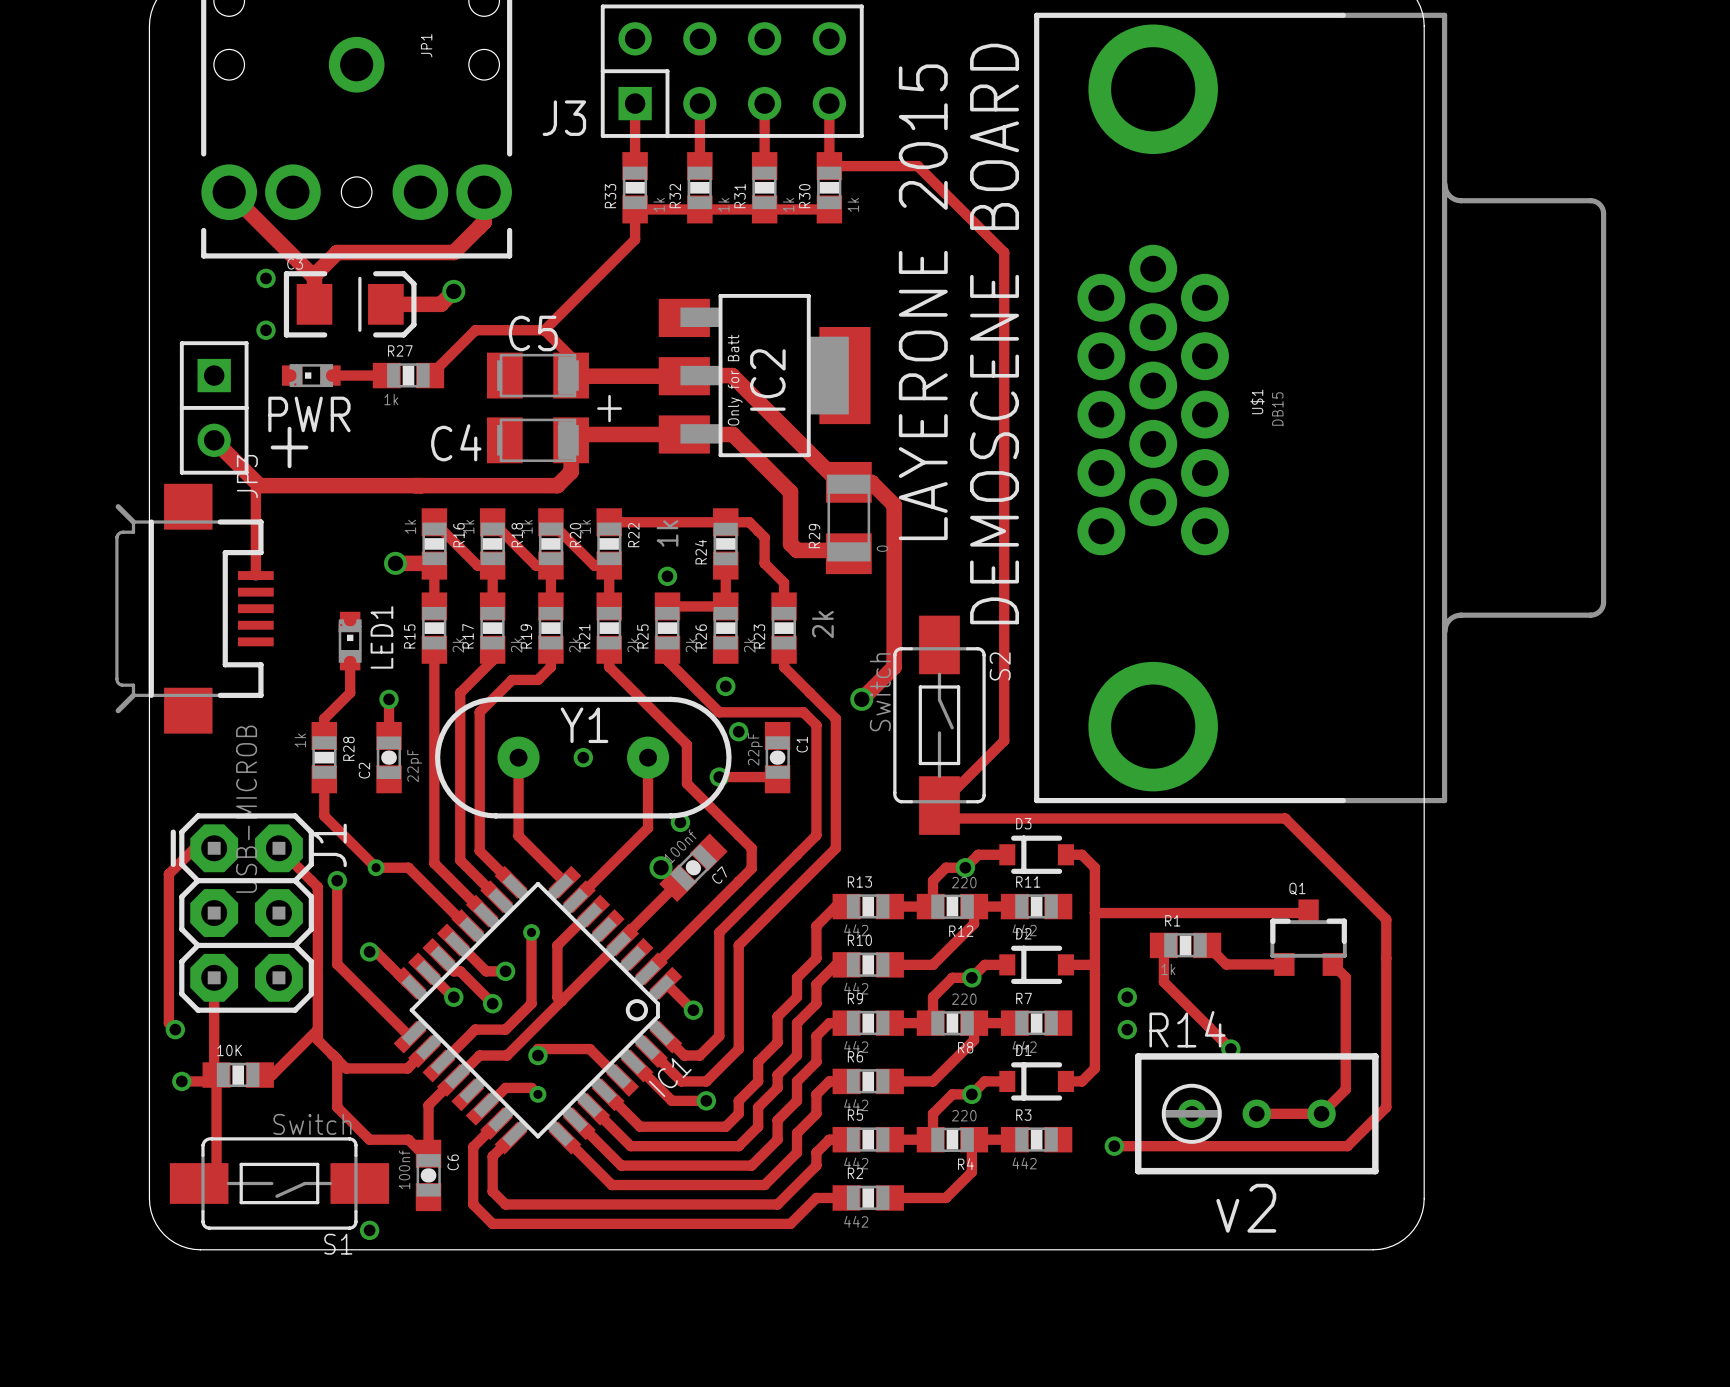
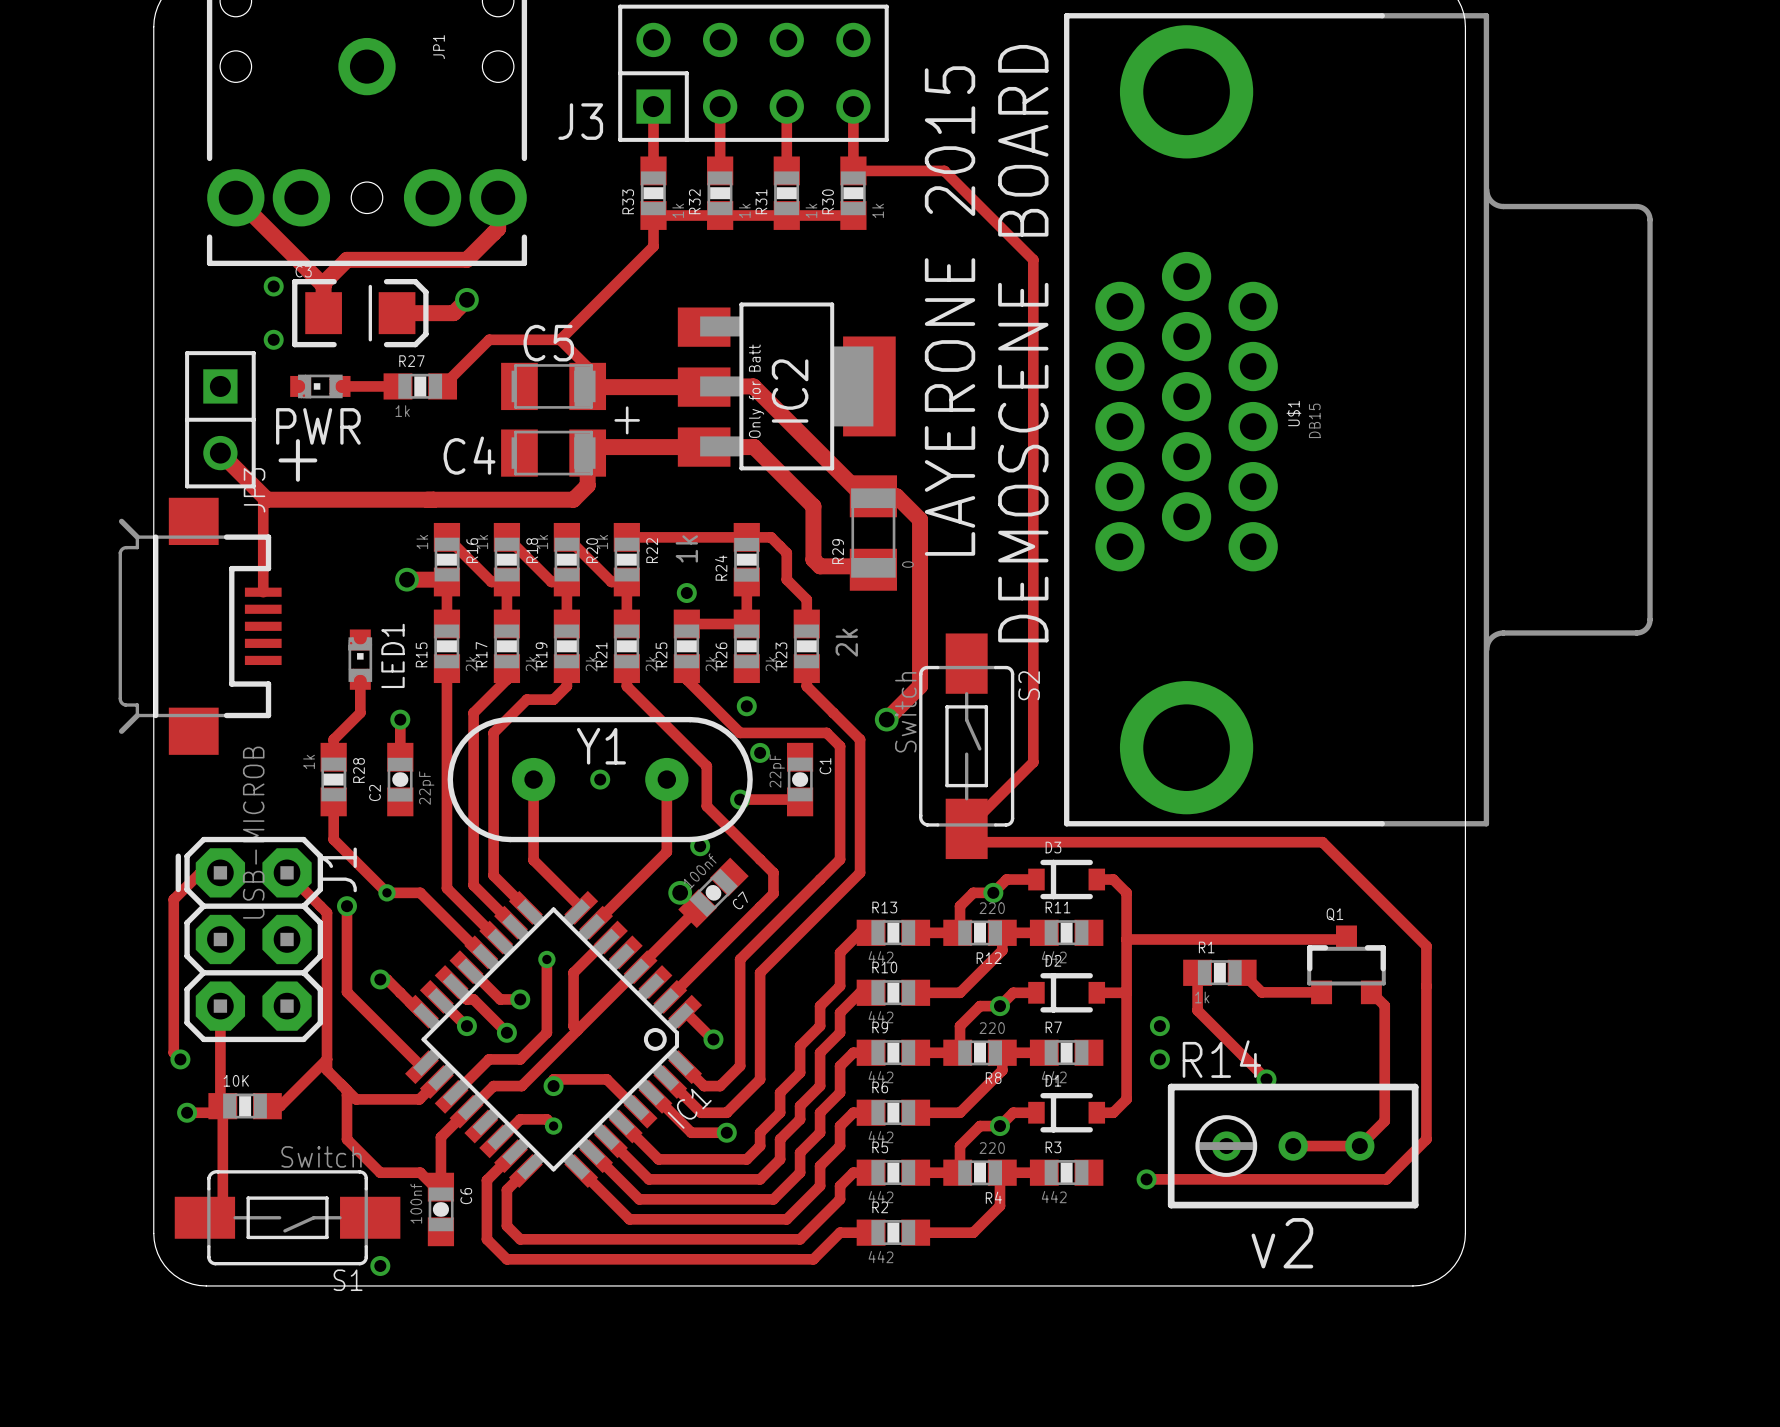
U$1 footprint: [1034, 12, 1607, 804] -> [1064, 13, 1653, 827]

